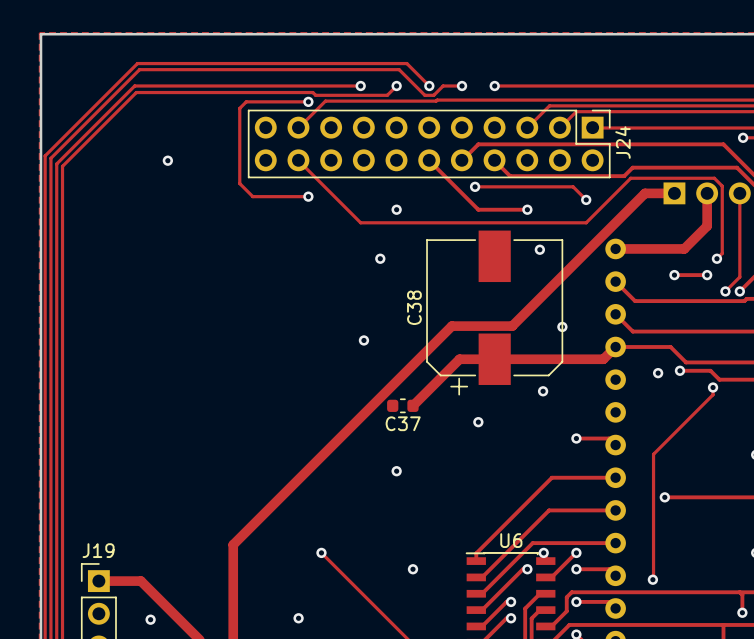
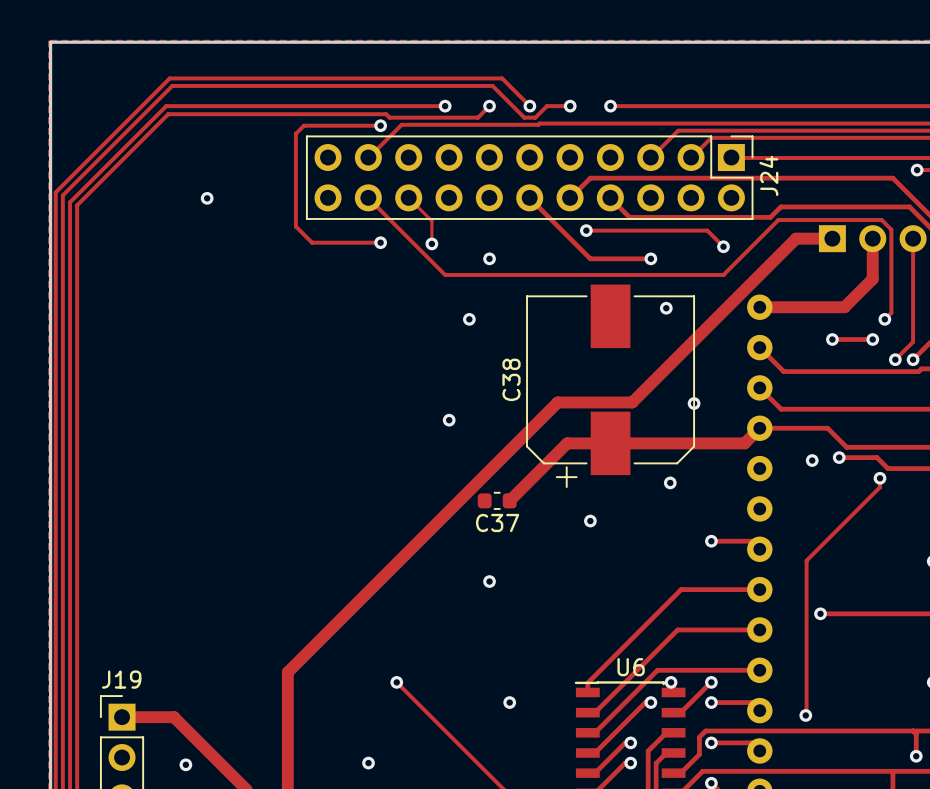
track: none -> (408, 197) (431, 221) (431, 243)
via: none -> (431, 243)

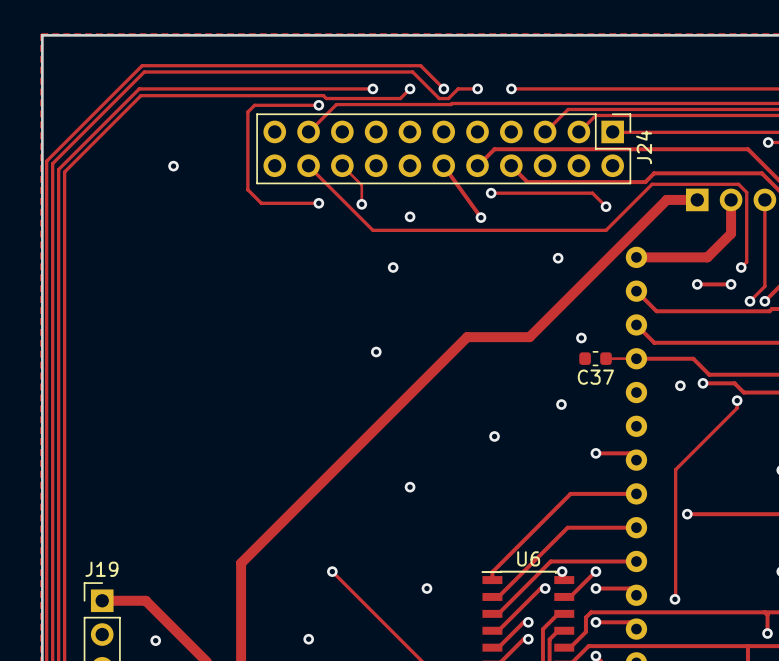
track: (529, 198) (590, 258) (650, 258) -> (443, 166) (480, 217)
via position: (650, 258) -> (480, 217)
C38: (610, 386) -> none
track: (759, 428) (744, 443) (567, 443) (509, 500) -> (636, 358) (606, 358)
C37 position: (497, 500) -> (595, 358)

